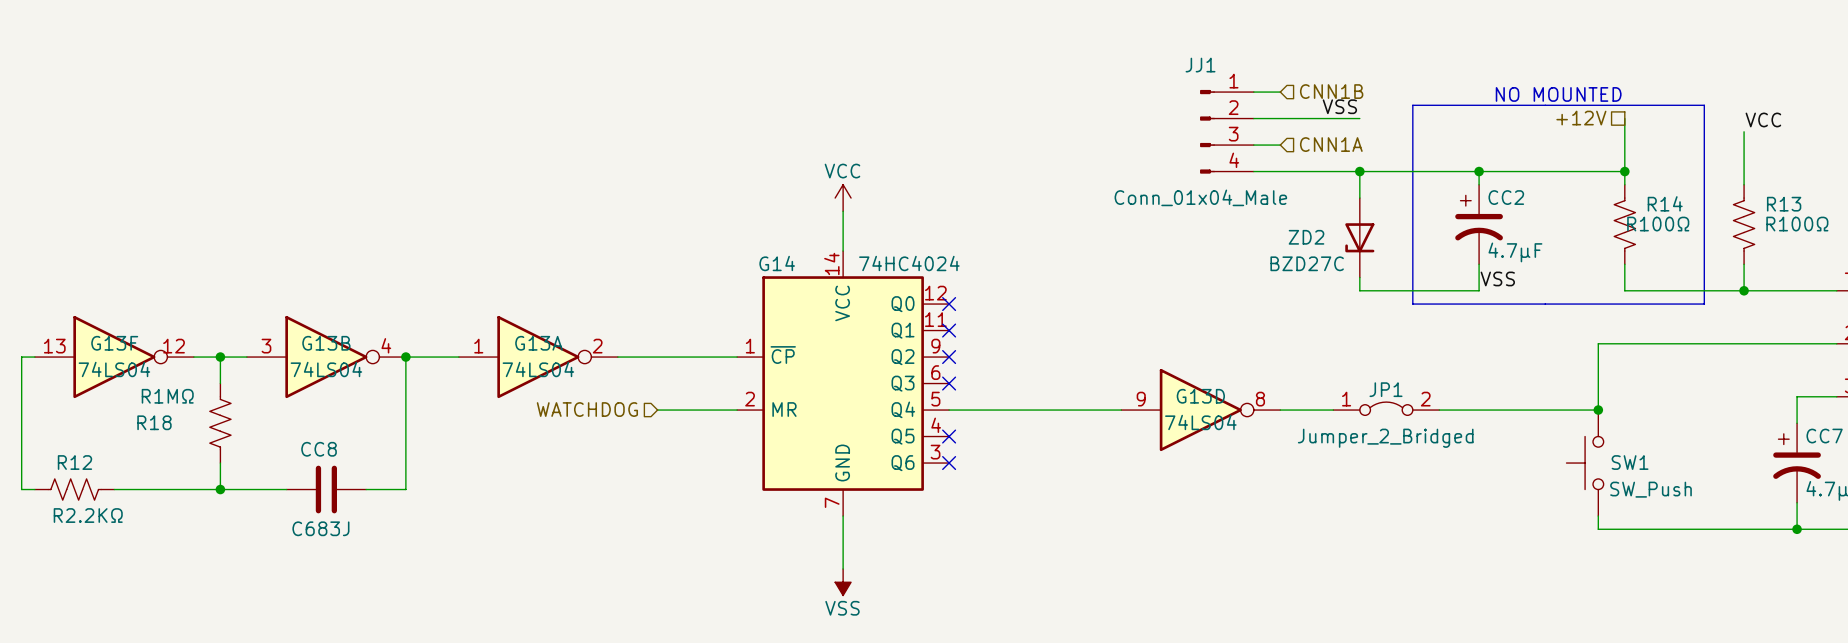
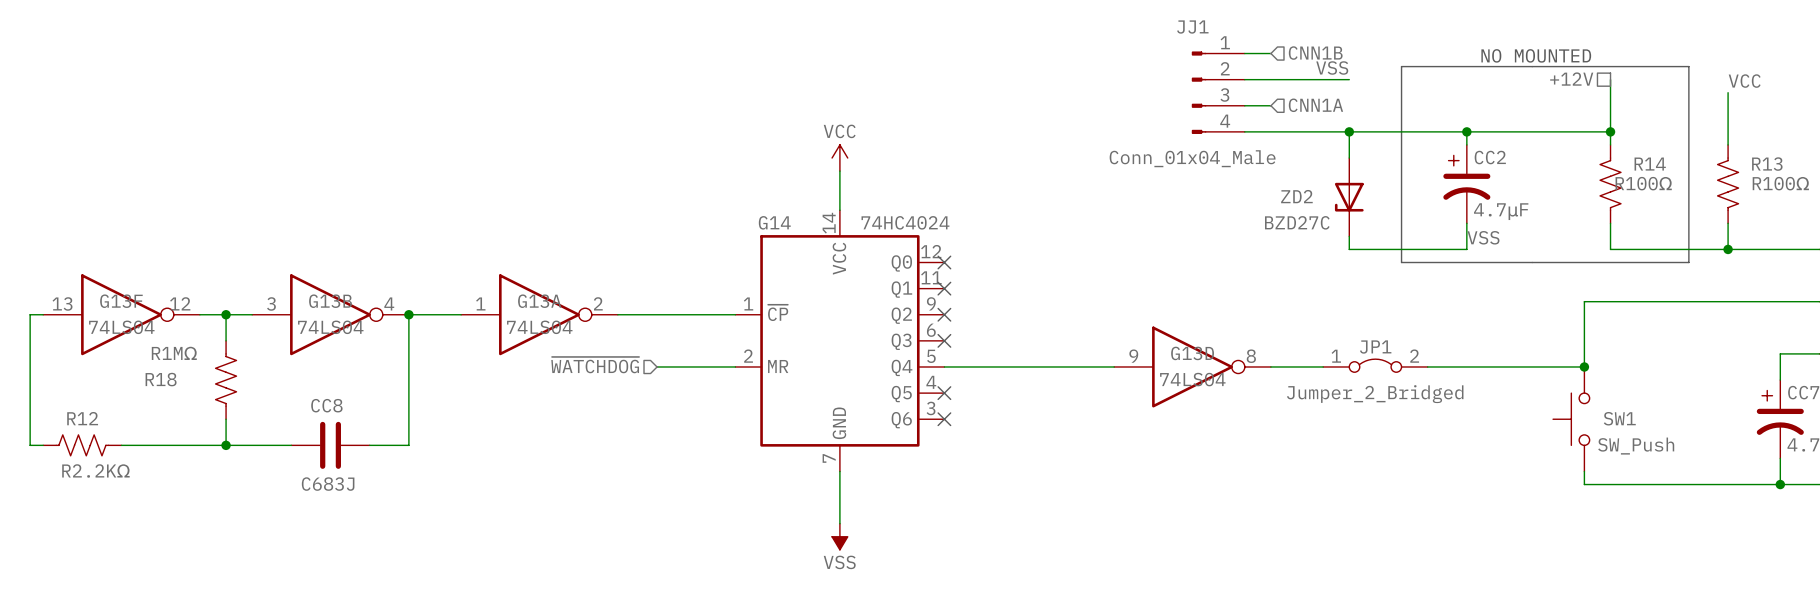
hierarchical label: WATCHDOG (587, 409) -> ~{WATCHDOG} (595, 365)

